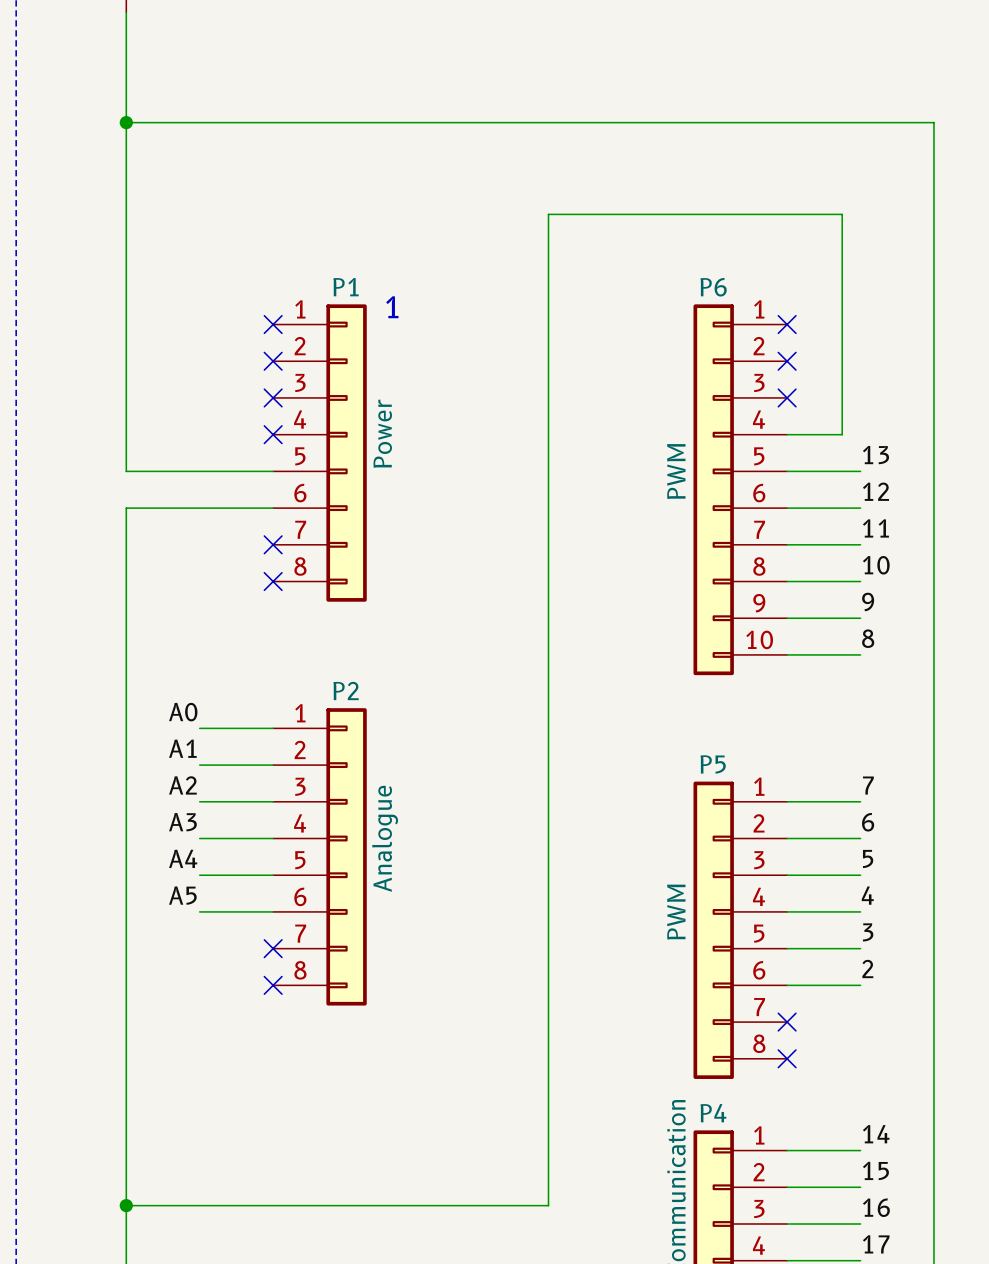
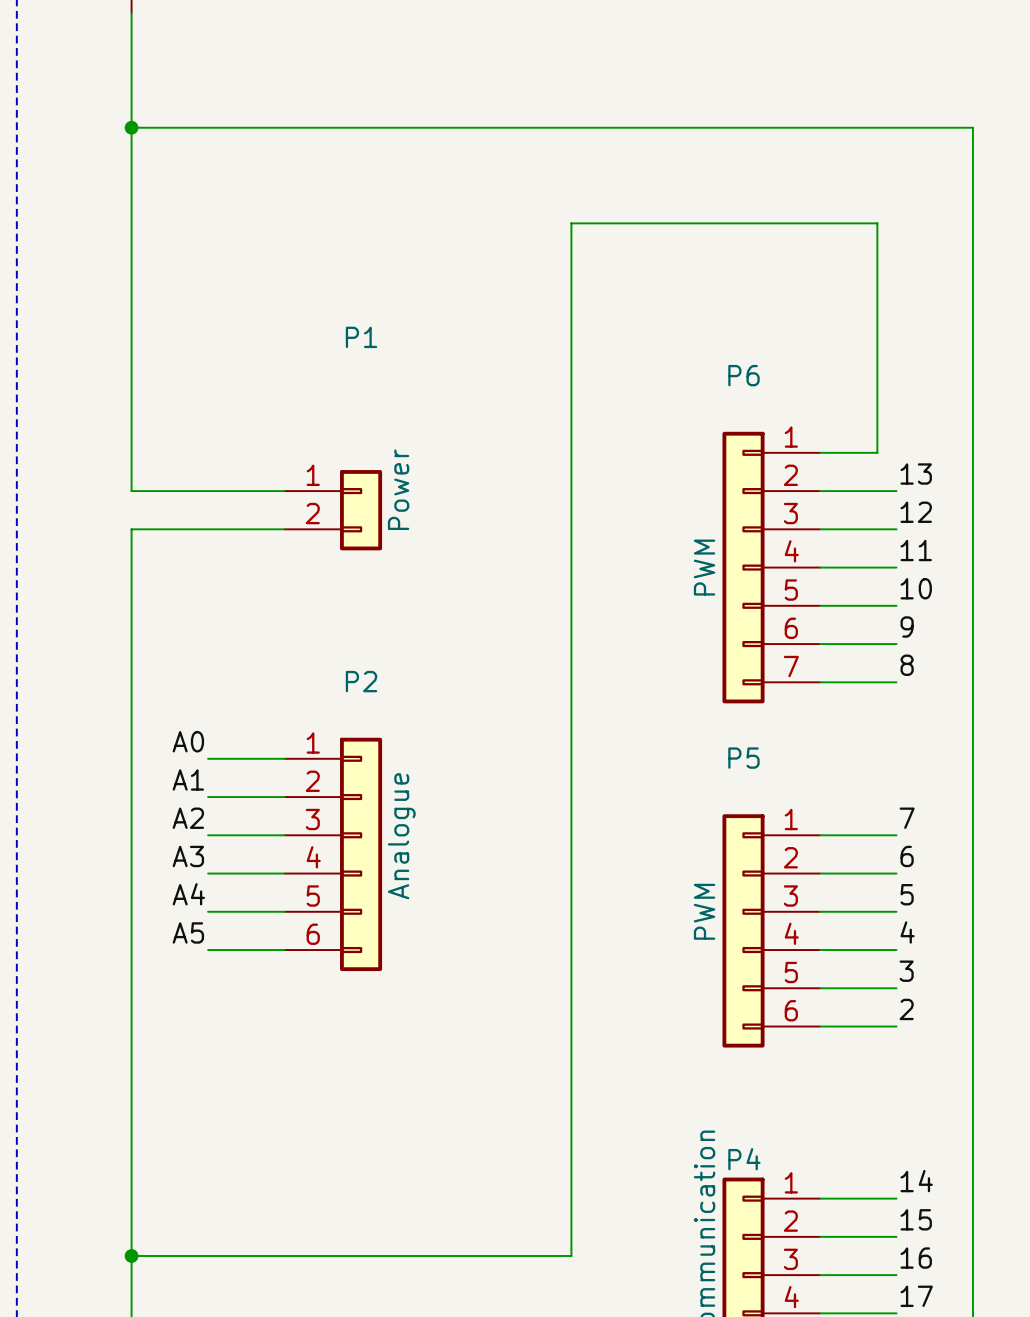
P1 symbol: [273, 304, 367, 602] -> [284, 470, 383, 551]
P6 symbol: [693, 304, 788, 676] -> [722, 431, 821, 704]
text: 1 (392, 307) -> none
no-connect mark: (273, 324) -> none
no-connect mark: (787, 324) -> none
no-connect mark: (273, 361) -> none
no-connect mark: (787, 361) -> none
no-connect mark: (273, 397) -> none
no-connect mark: (787, 397) -> none
no-connect mark: (273, 434) -> none
no-connect mark: (273, 544) -> none
no-connect mark: (273, 581) -> none
P2 symbol: [273, 708, 367, 1006] -> [284, 737, 383, 972]
P5 symbol: [693, 781, 788, 1079] -> [722, 814, 821, 1048]
no-connect mark: (273, 948) -> none
no-connect mark: (273, 985) -> none
no-connect mark: (787, 1022) -> none
no-connect mark: (787, 1058) -> none

